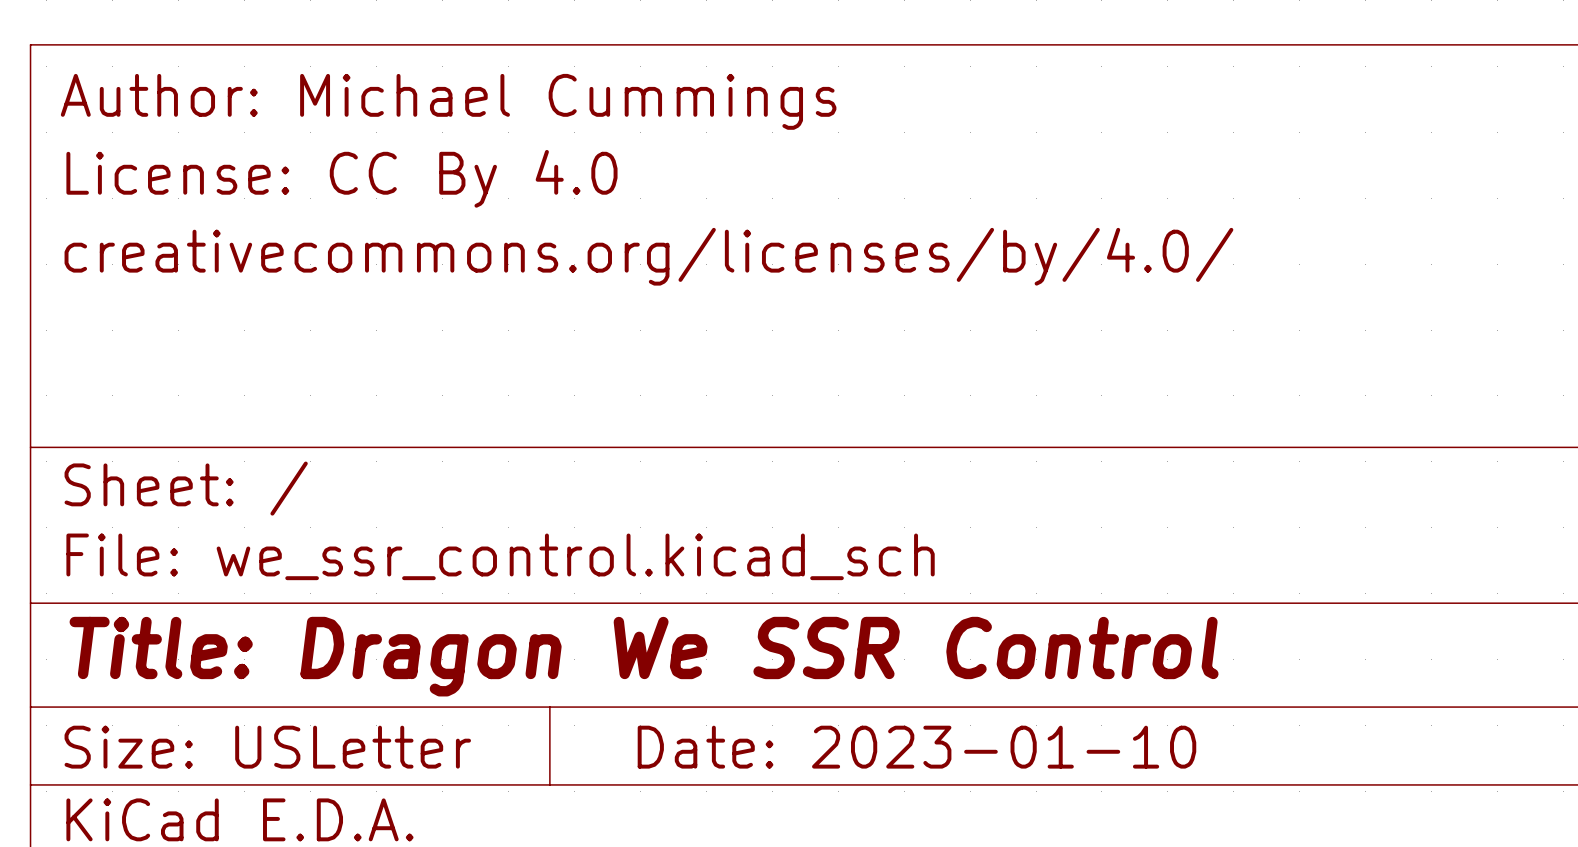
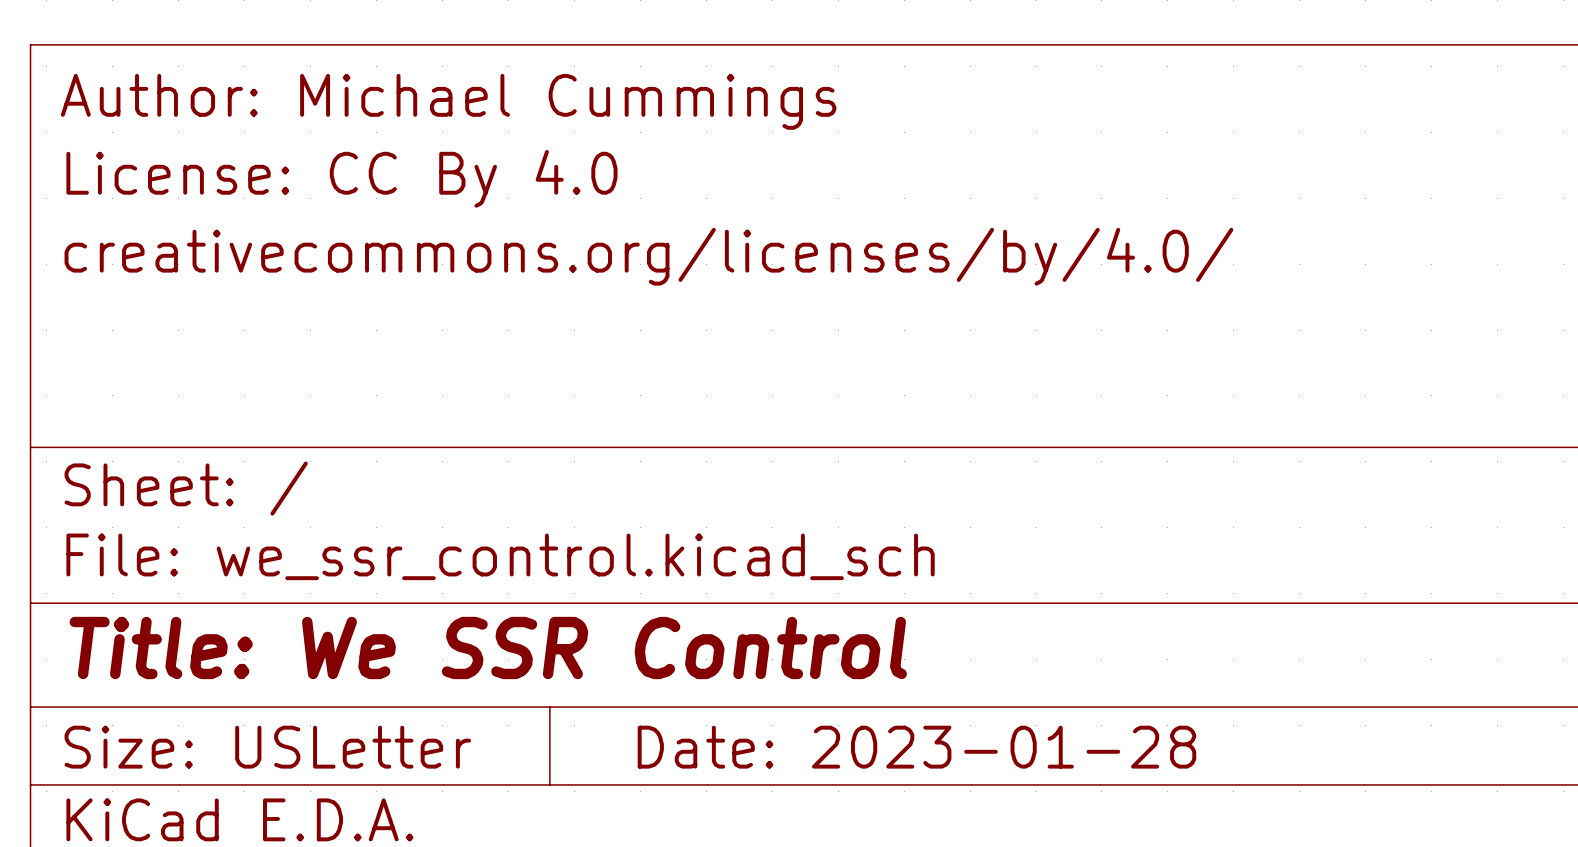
title block: Title: Dragon We SSR Control (644, 656) -> Title: We SSR Control (488, 647)
title block: Date: 2023-01-10 (916, 747) -> Date: 2023-01-28 (916, 747)

